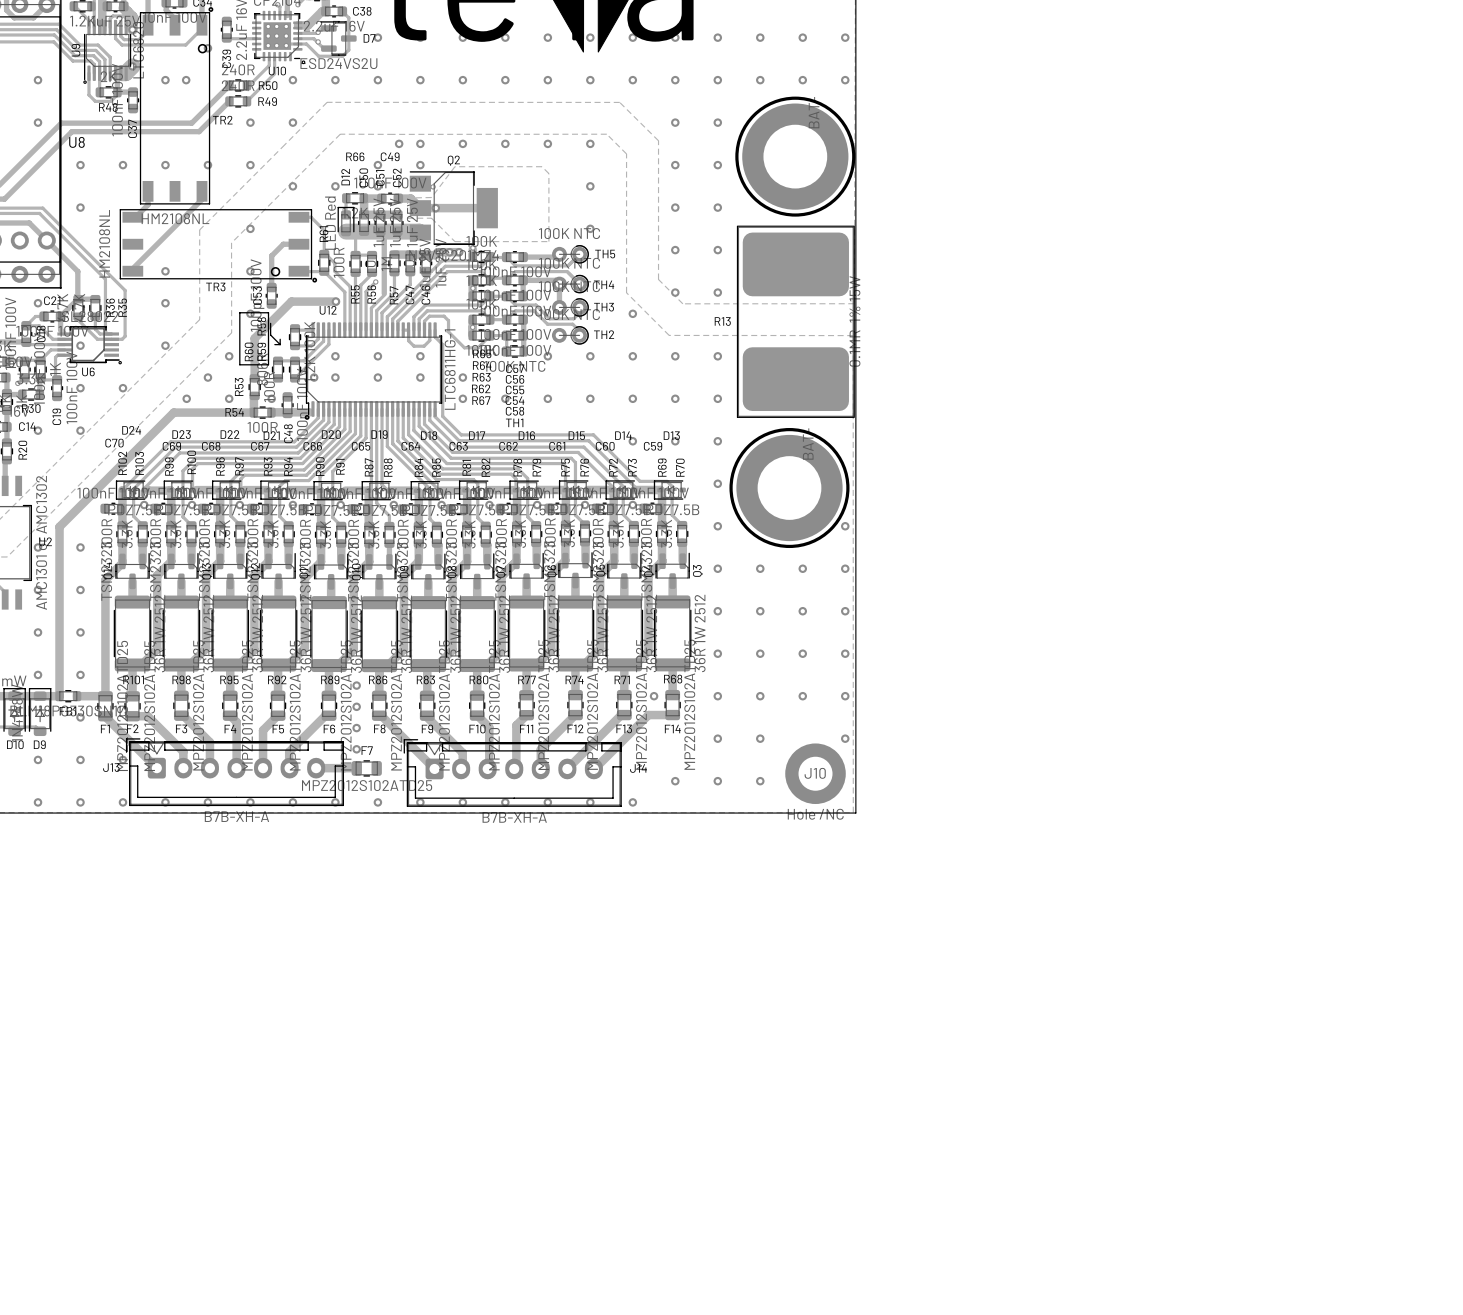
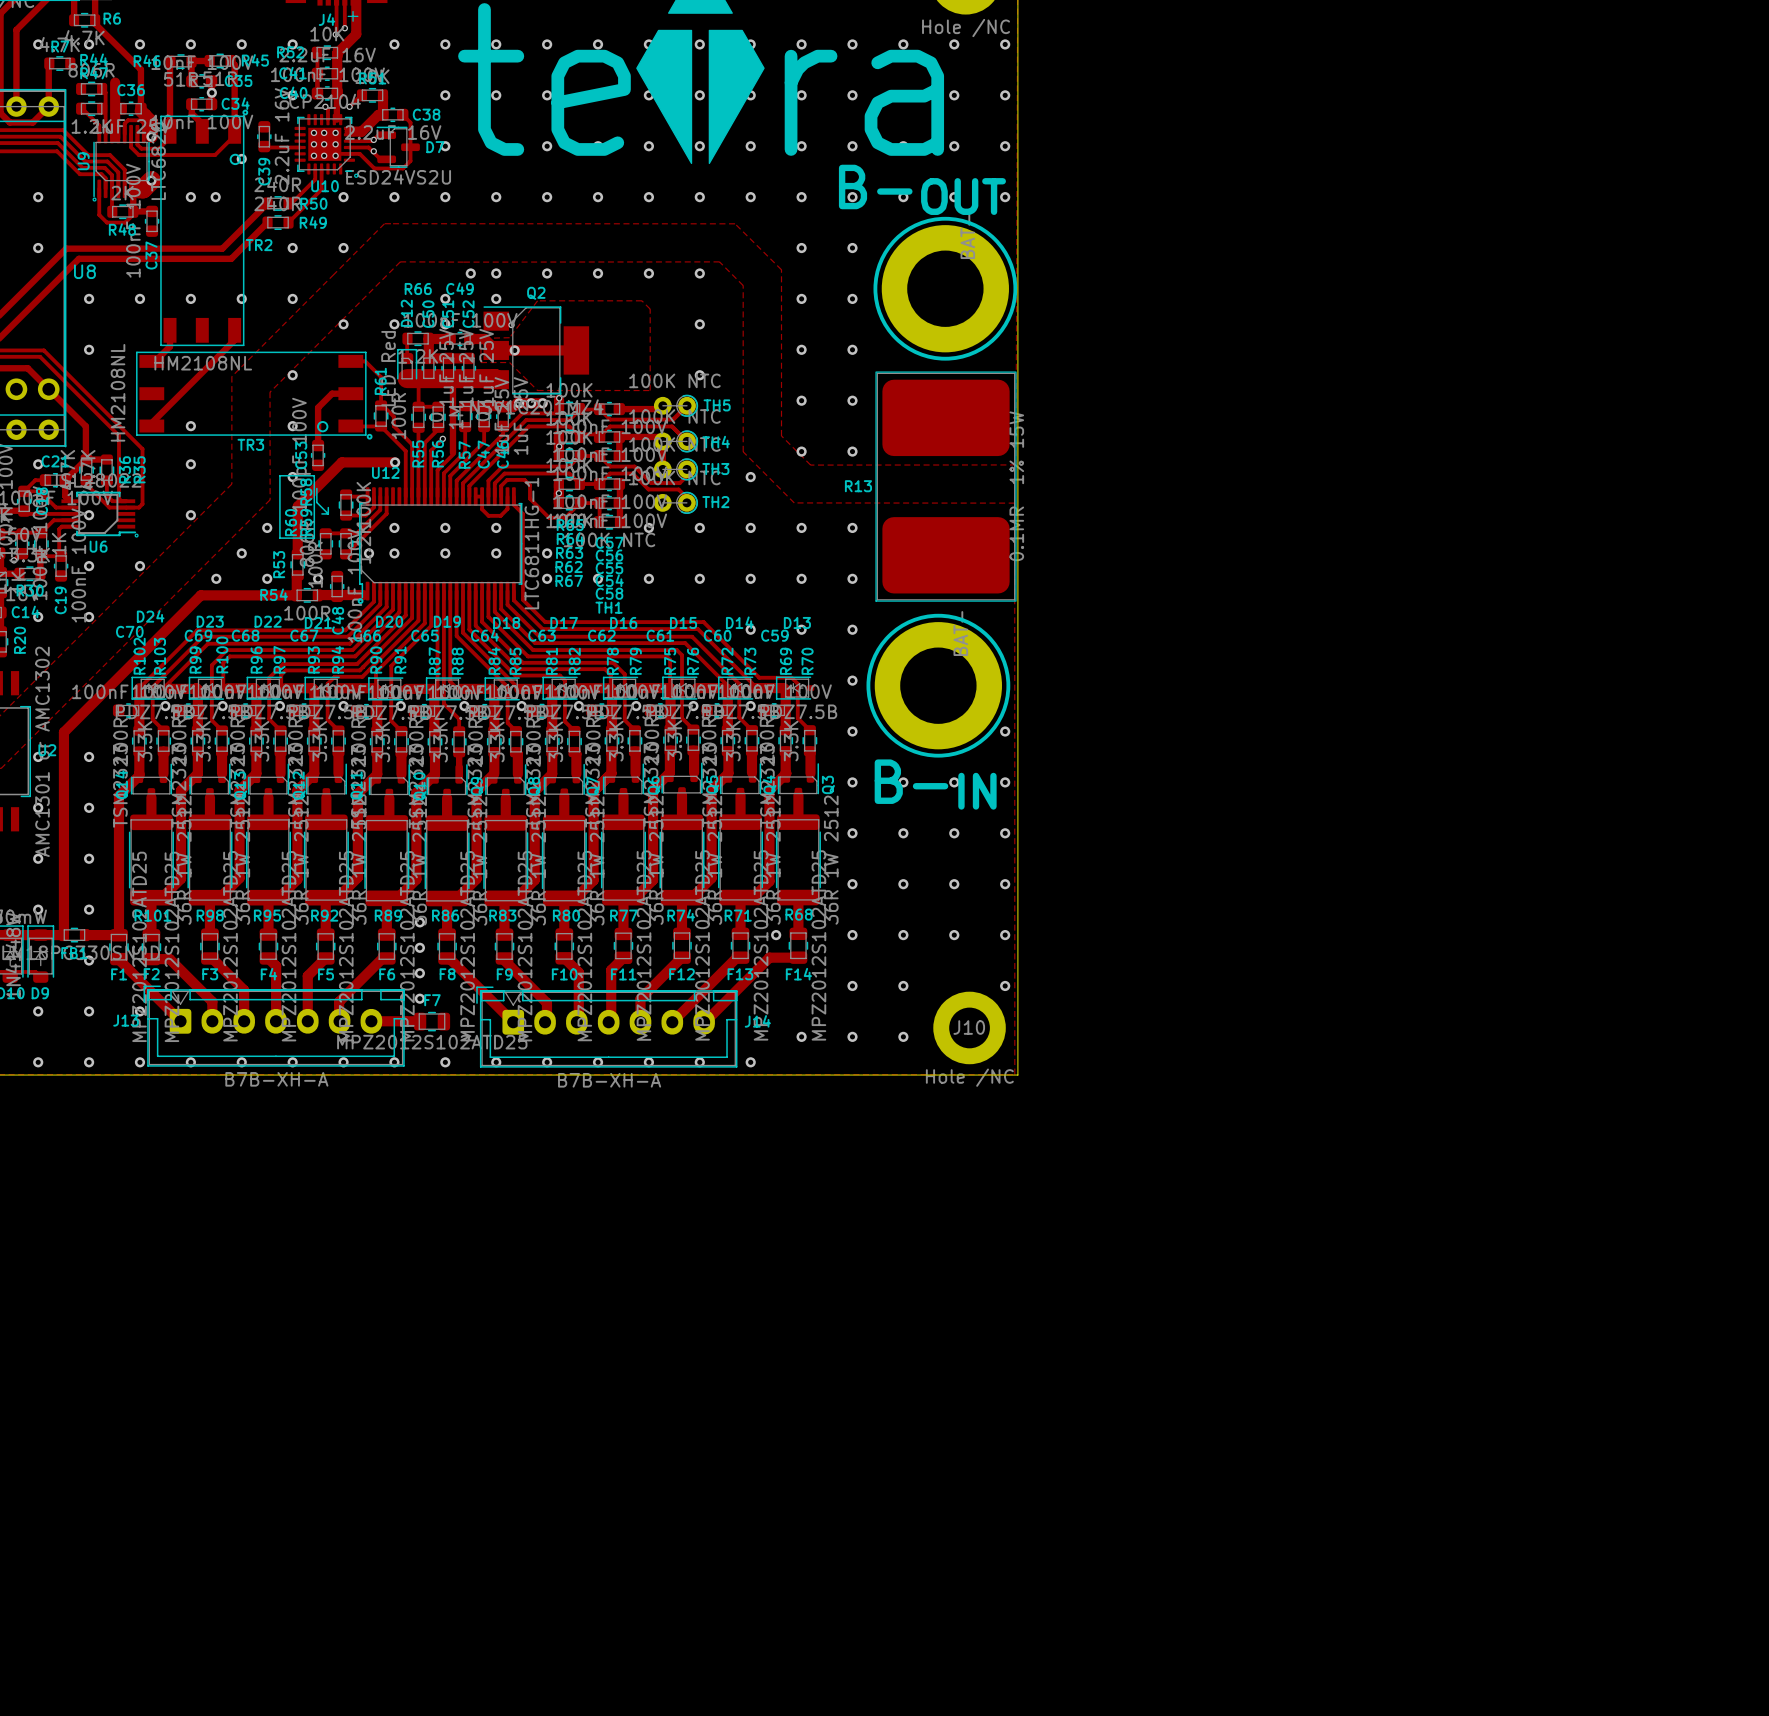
text: none -> B-OUT (922, 189)
text: none -> B-IN (935, 784)

